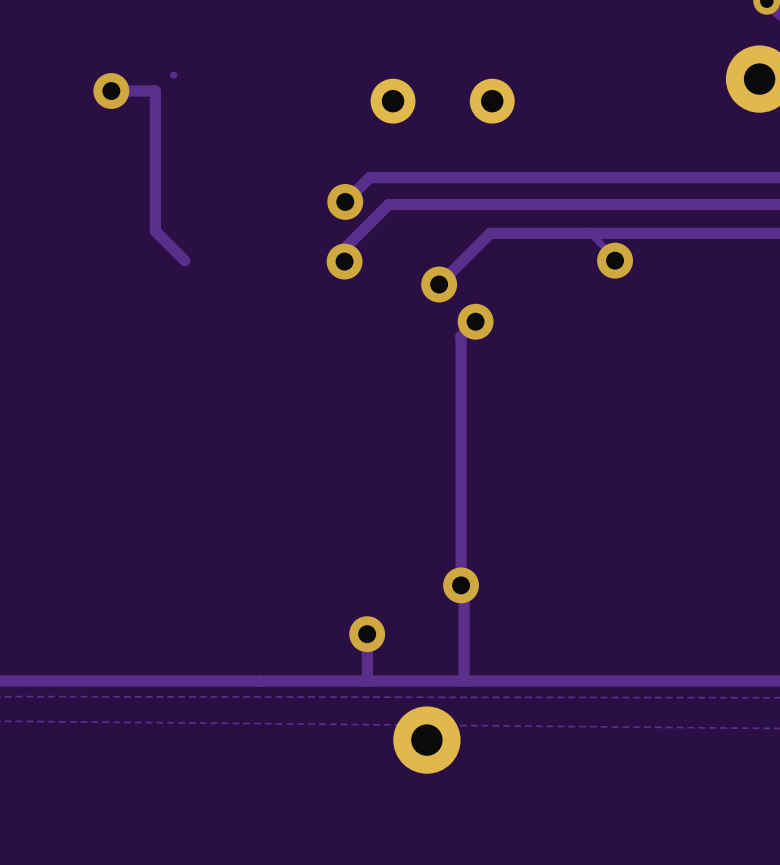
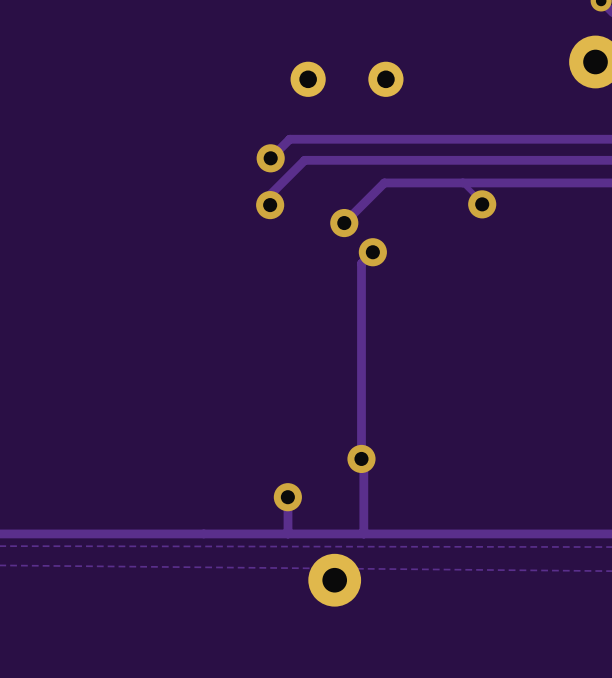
track: (174, 75) (173, 75) -> none
via: (111, 91) -> none
track: (155, 91) (111, 91) (109, 92) -> none
track: (155, 91) (155, 231) (184, 260) -> none

